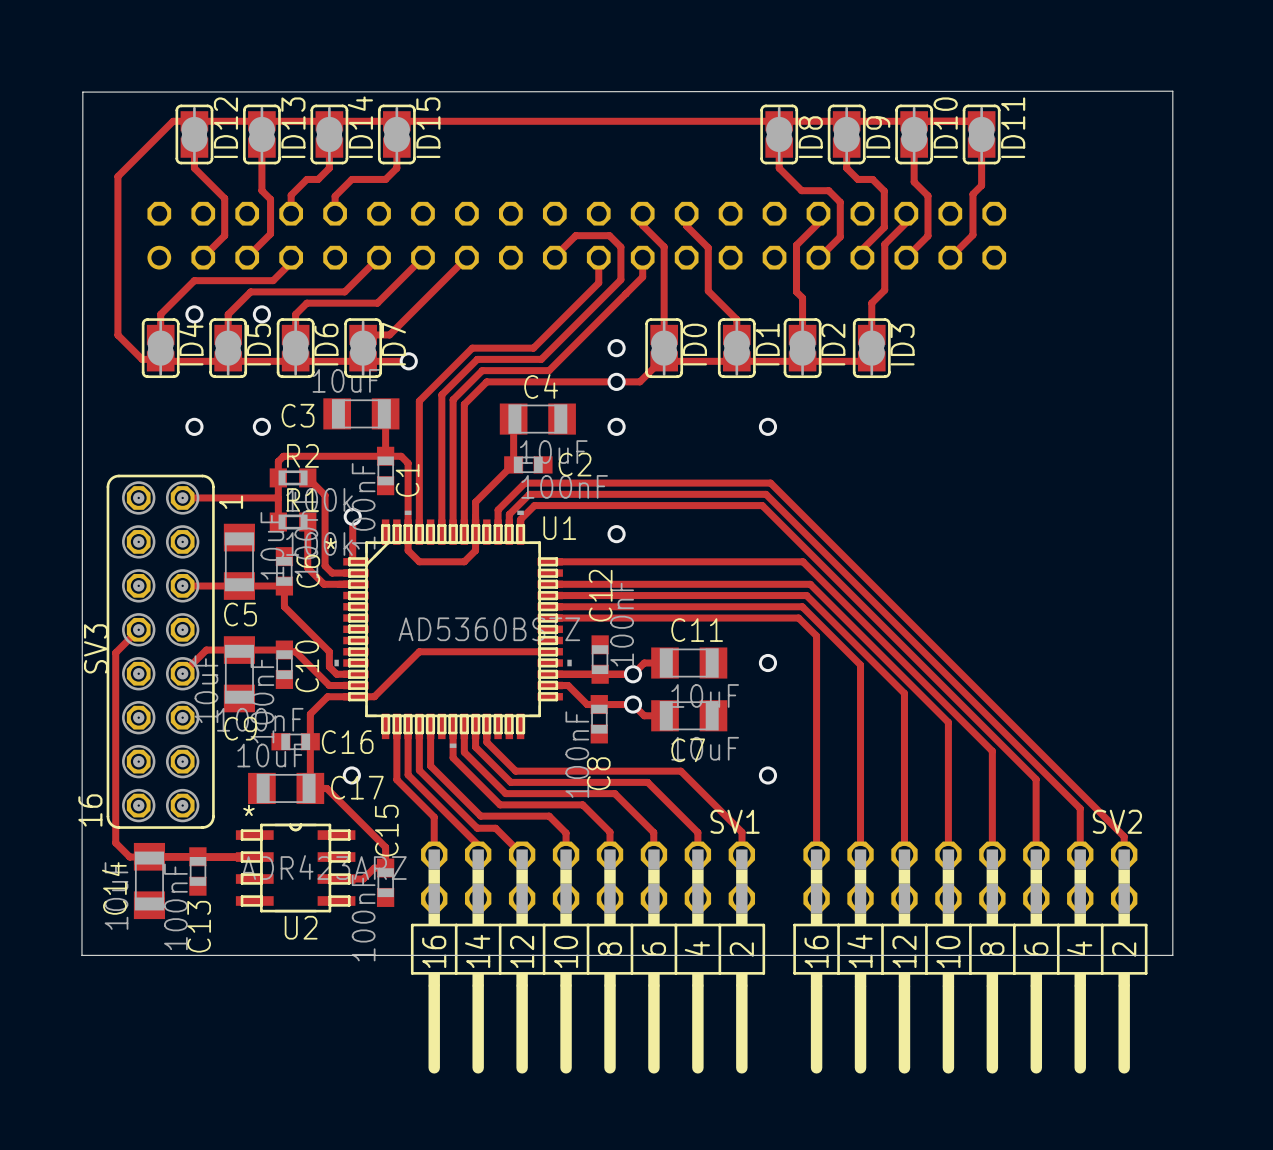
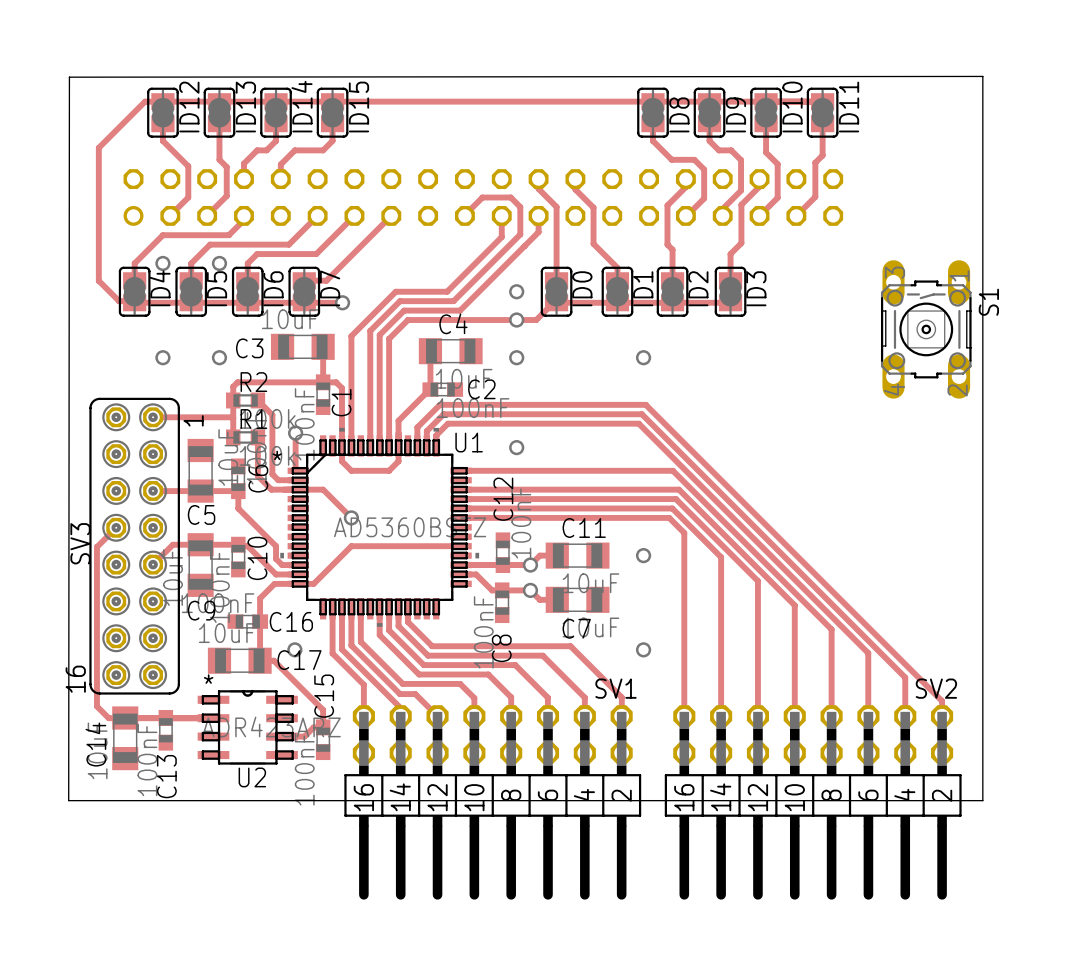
S1: none -> (926, 329)
track: none -> (298, 489) (323, 489) (351, 517)
via: none -> (351, 517)

